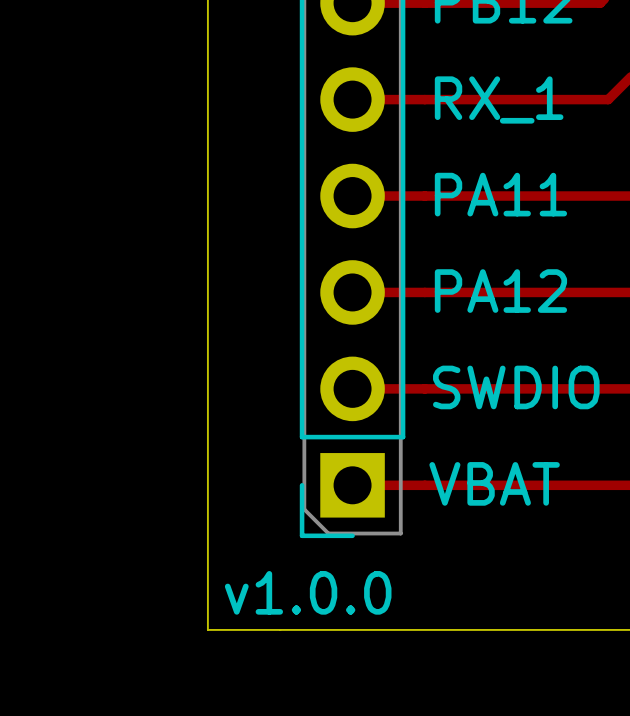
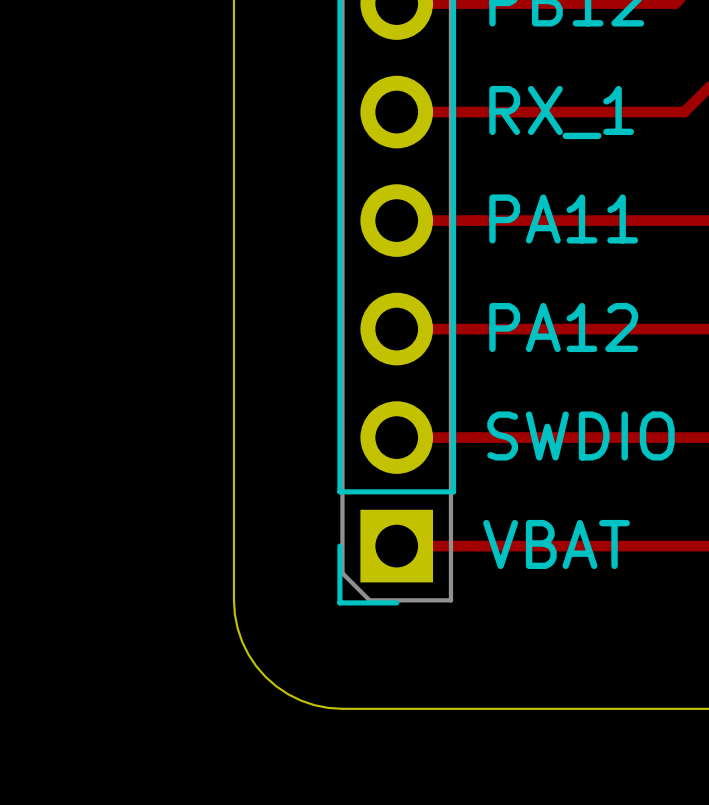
board edge: (207, 533) (207, 629) (304, 629) -> (233, 600) (234, 614) (242, 641) (248, 654) (265, 677) (288, 694) (300, 700) (314, 705) (342, 708)
text: v1.0.0 (308, 592) -> none

